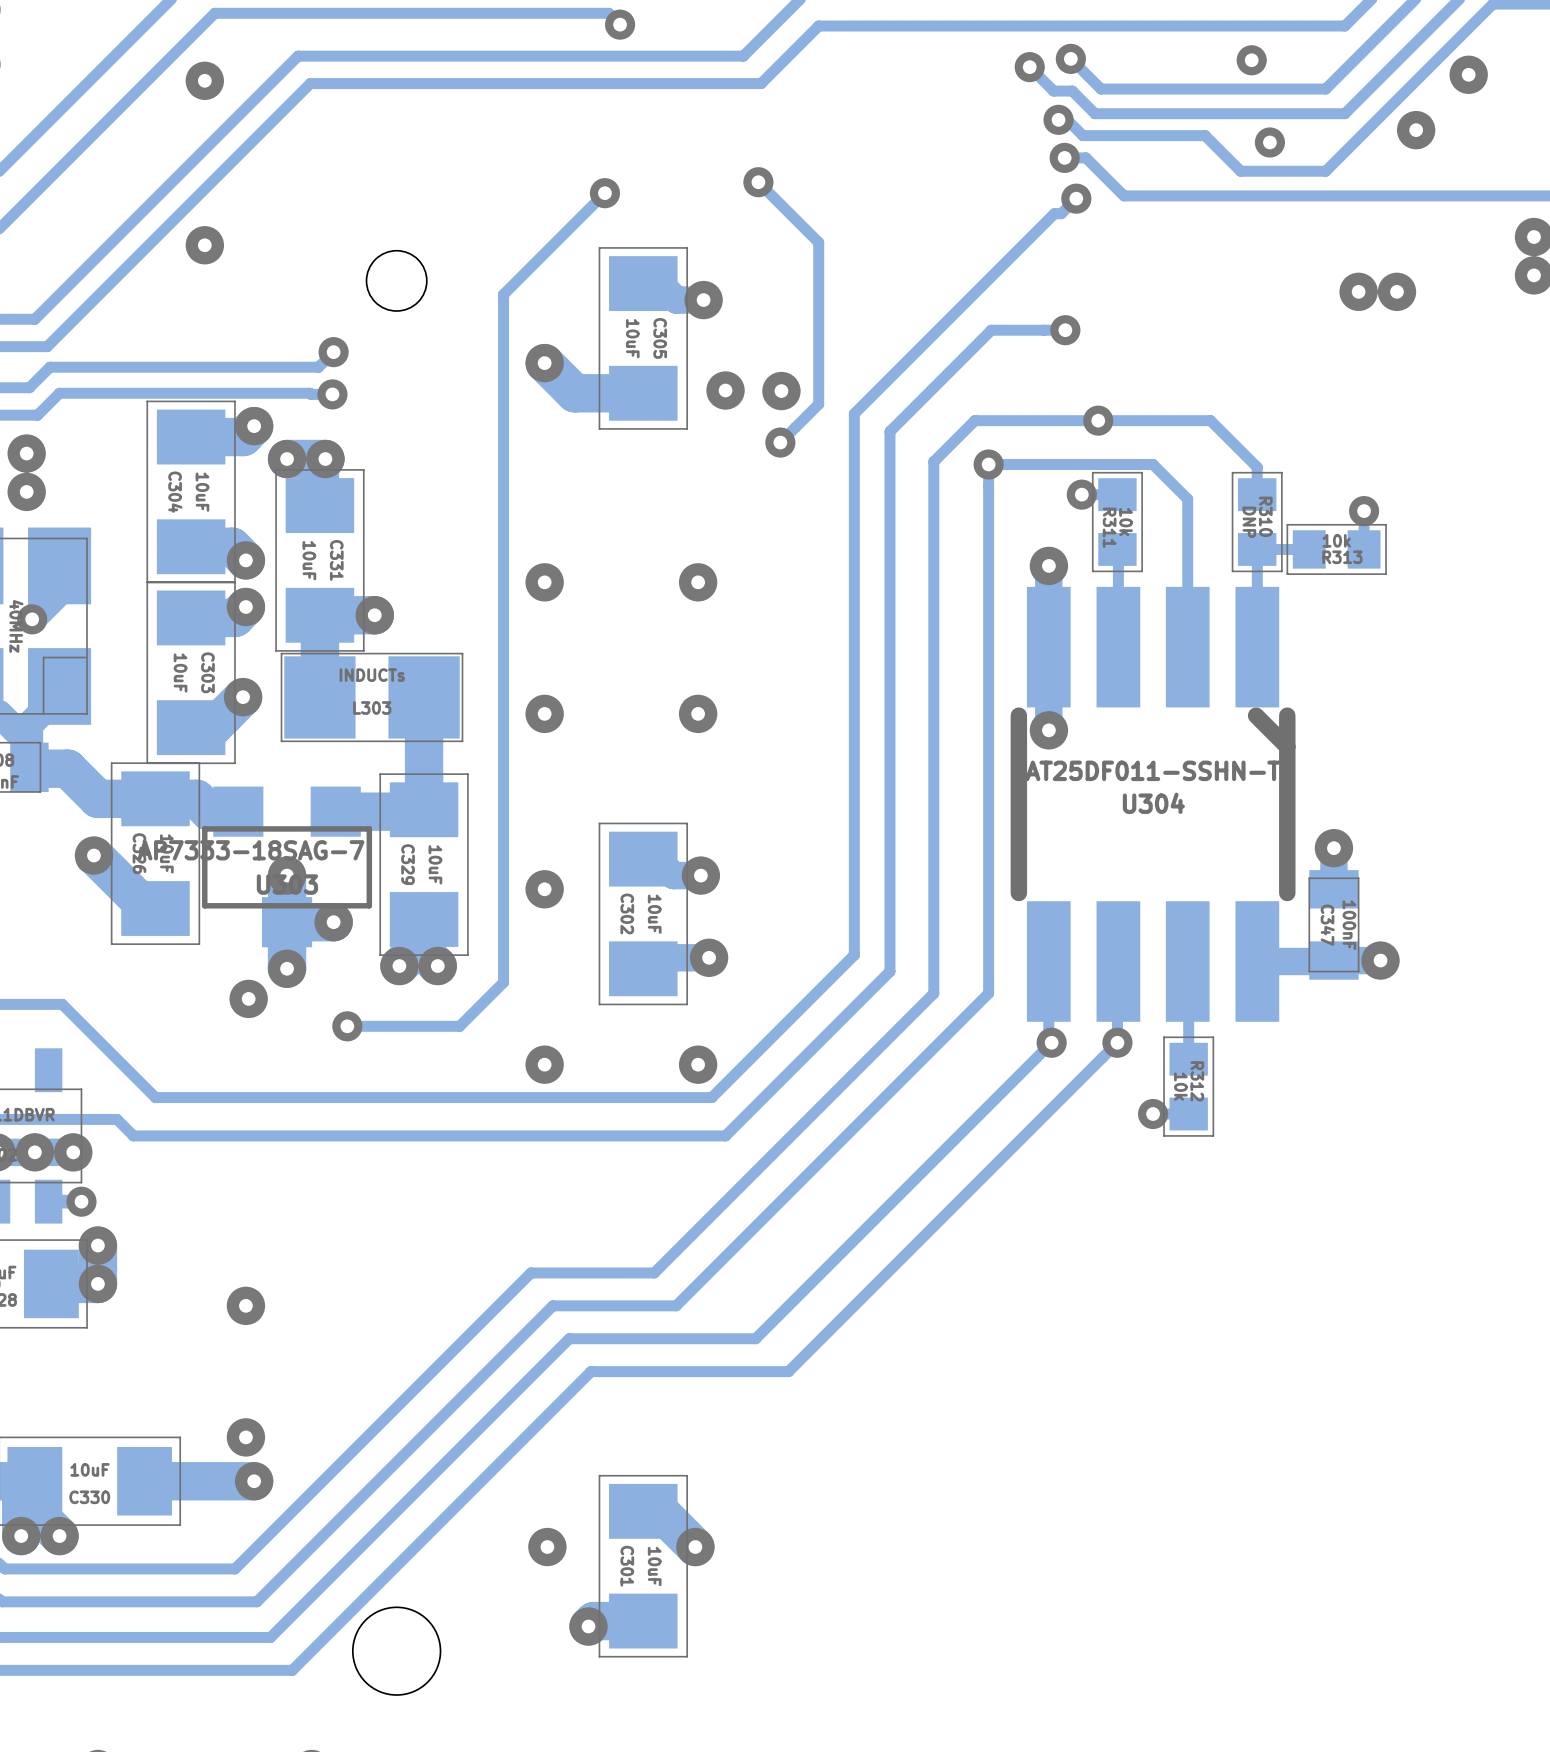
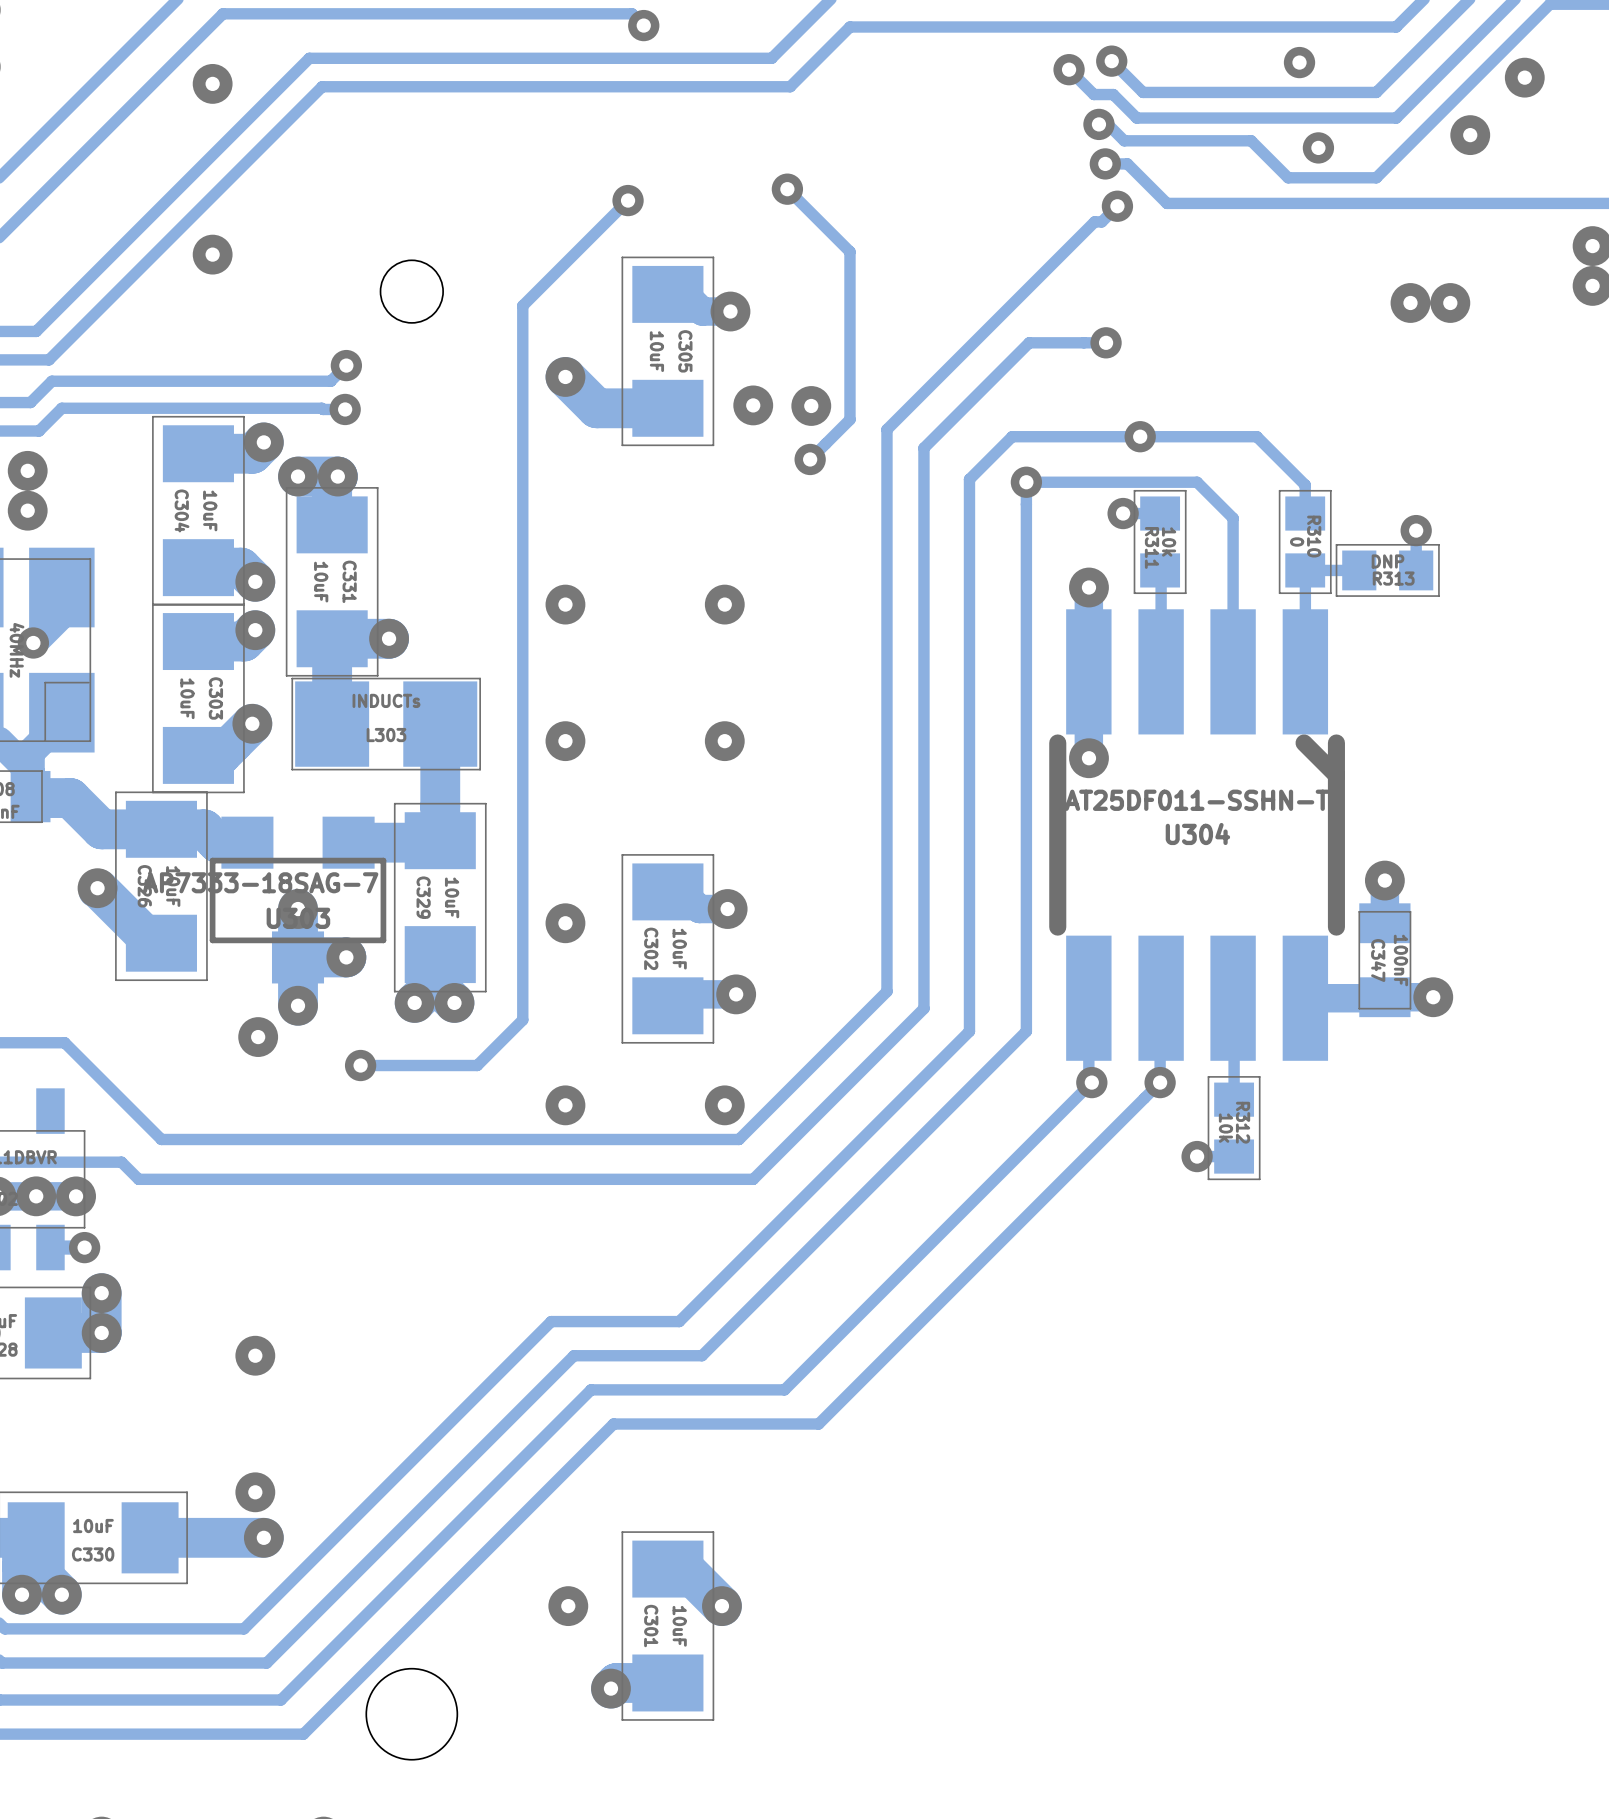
R310 value: DNP (1249, 522) -> 0 (1297, 541)
R313 value: 10k (1336, 540) -> DNP (1388, 561)

